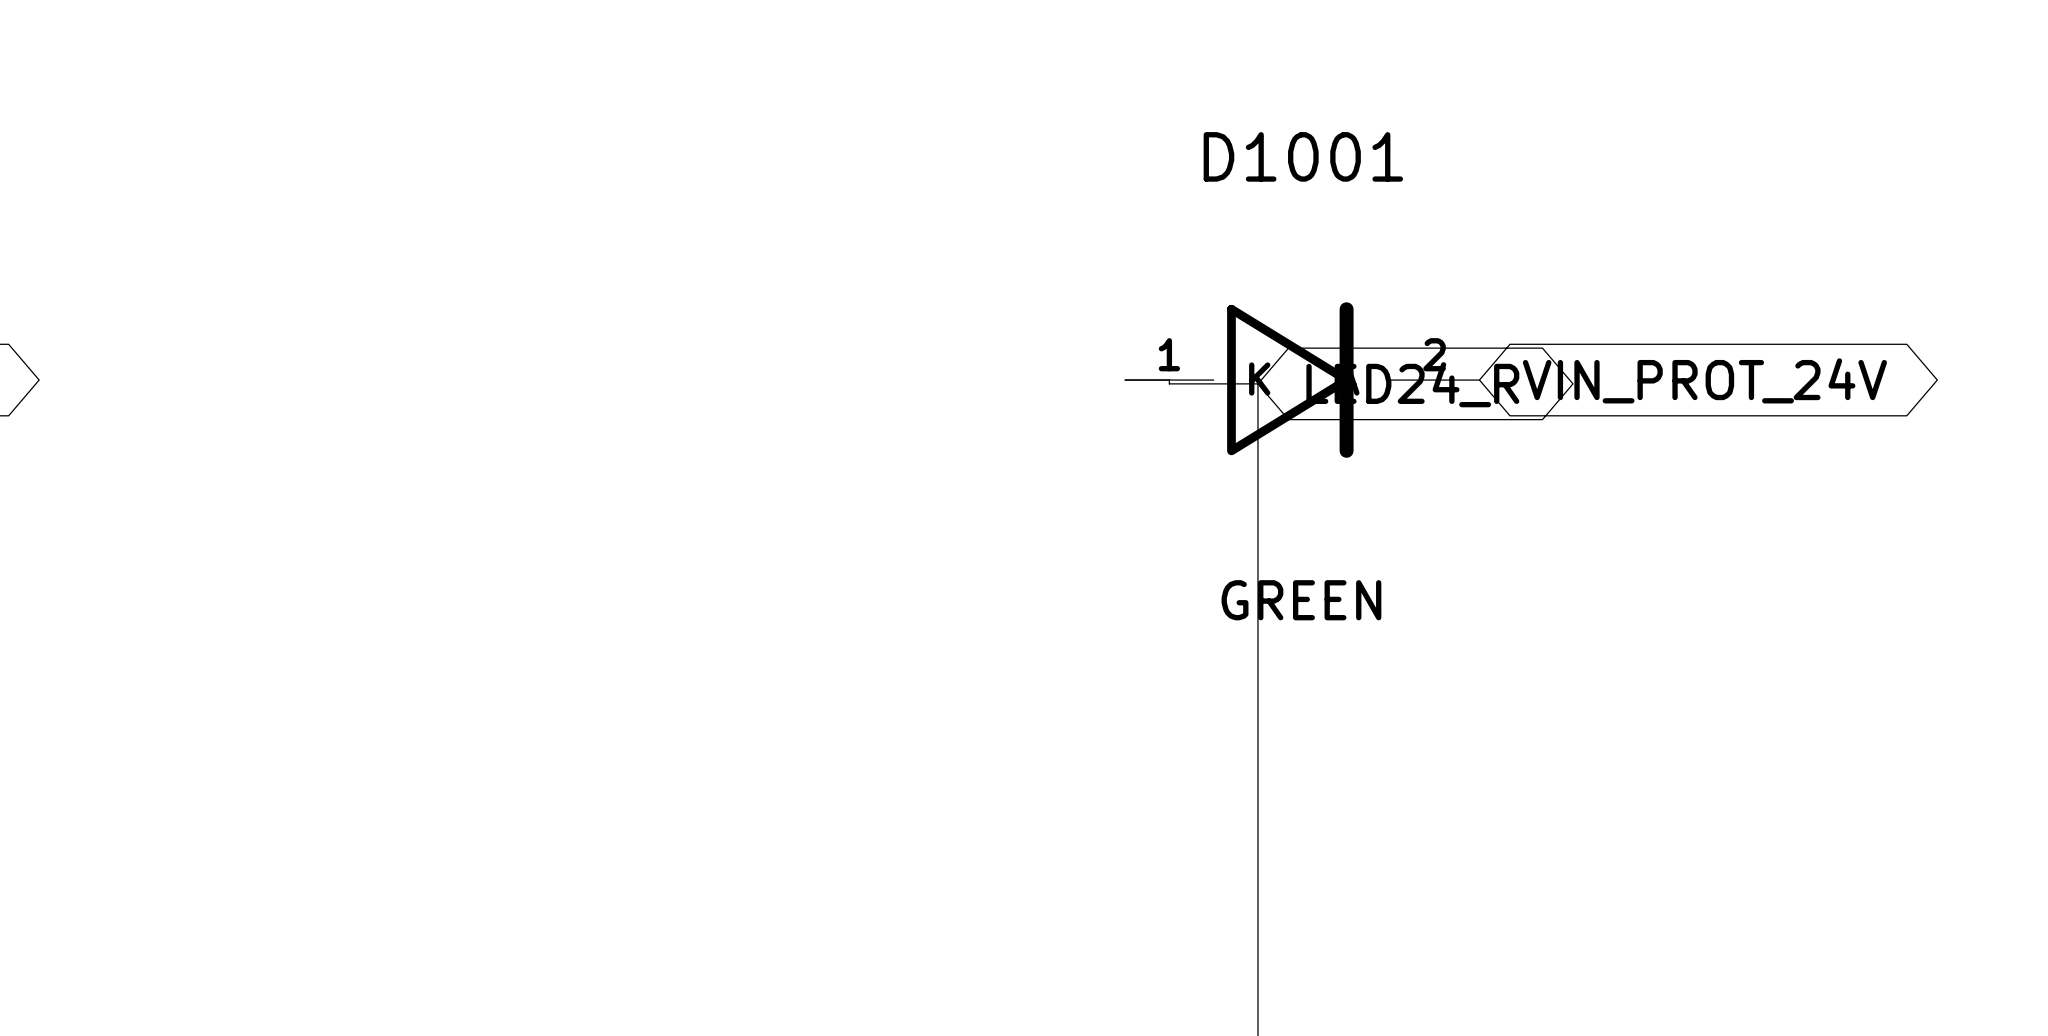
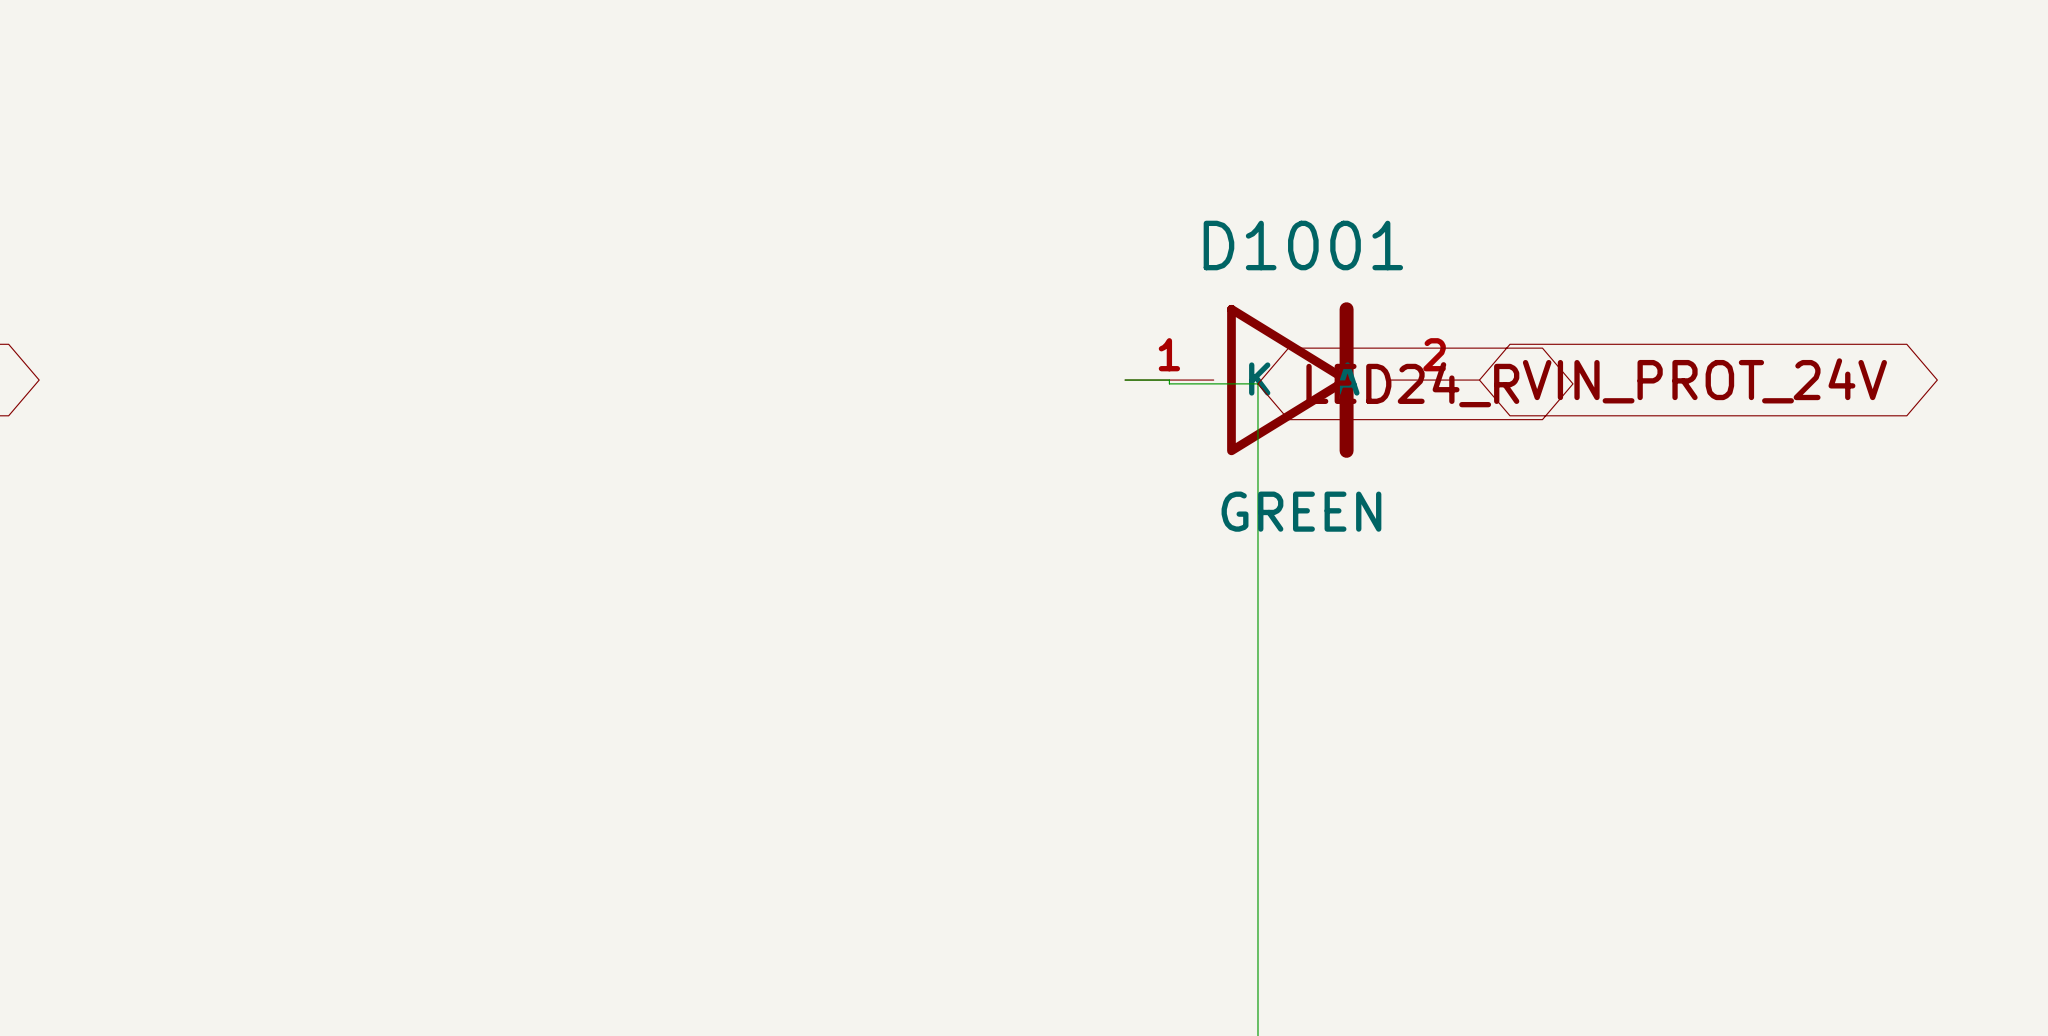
D1001 name position: D1001 (1303, 156) -> D1001 (1303, 245)
D1001 value position: GREEN (1301, 600) -> GREEN (1301, 511)

